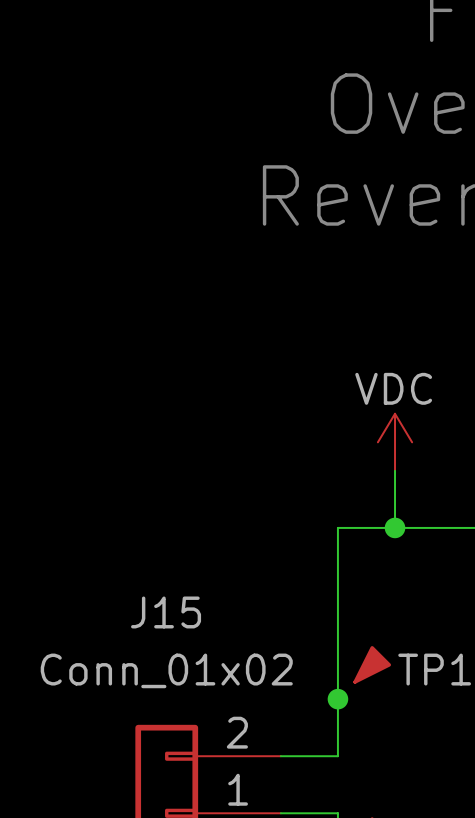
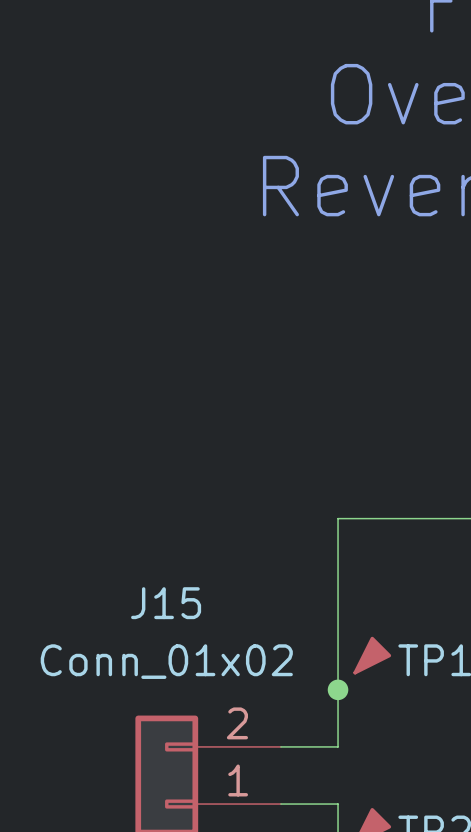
power symbol: VDC (395, 442) -> none
wire: (395, 470) (395, 527) -> none
junction: (395, 527) -> none

